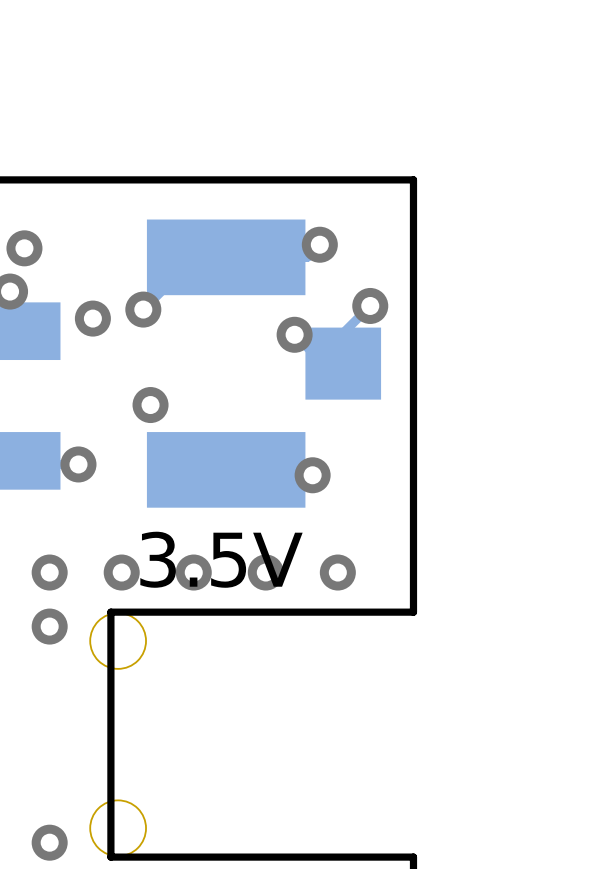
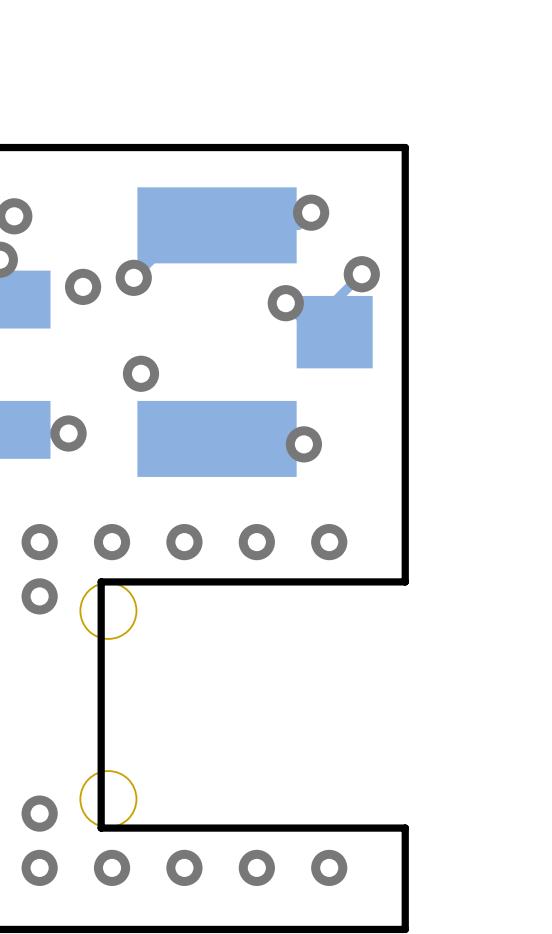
text: 3.5V (221, 559) -> none

